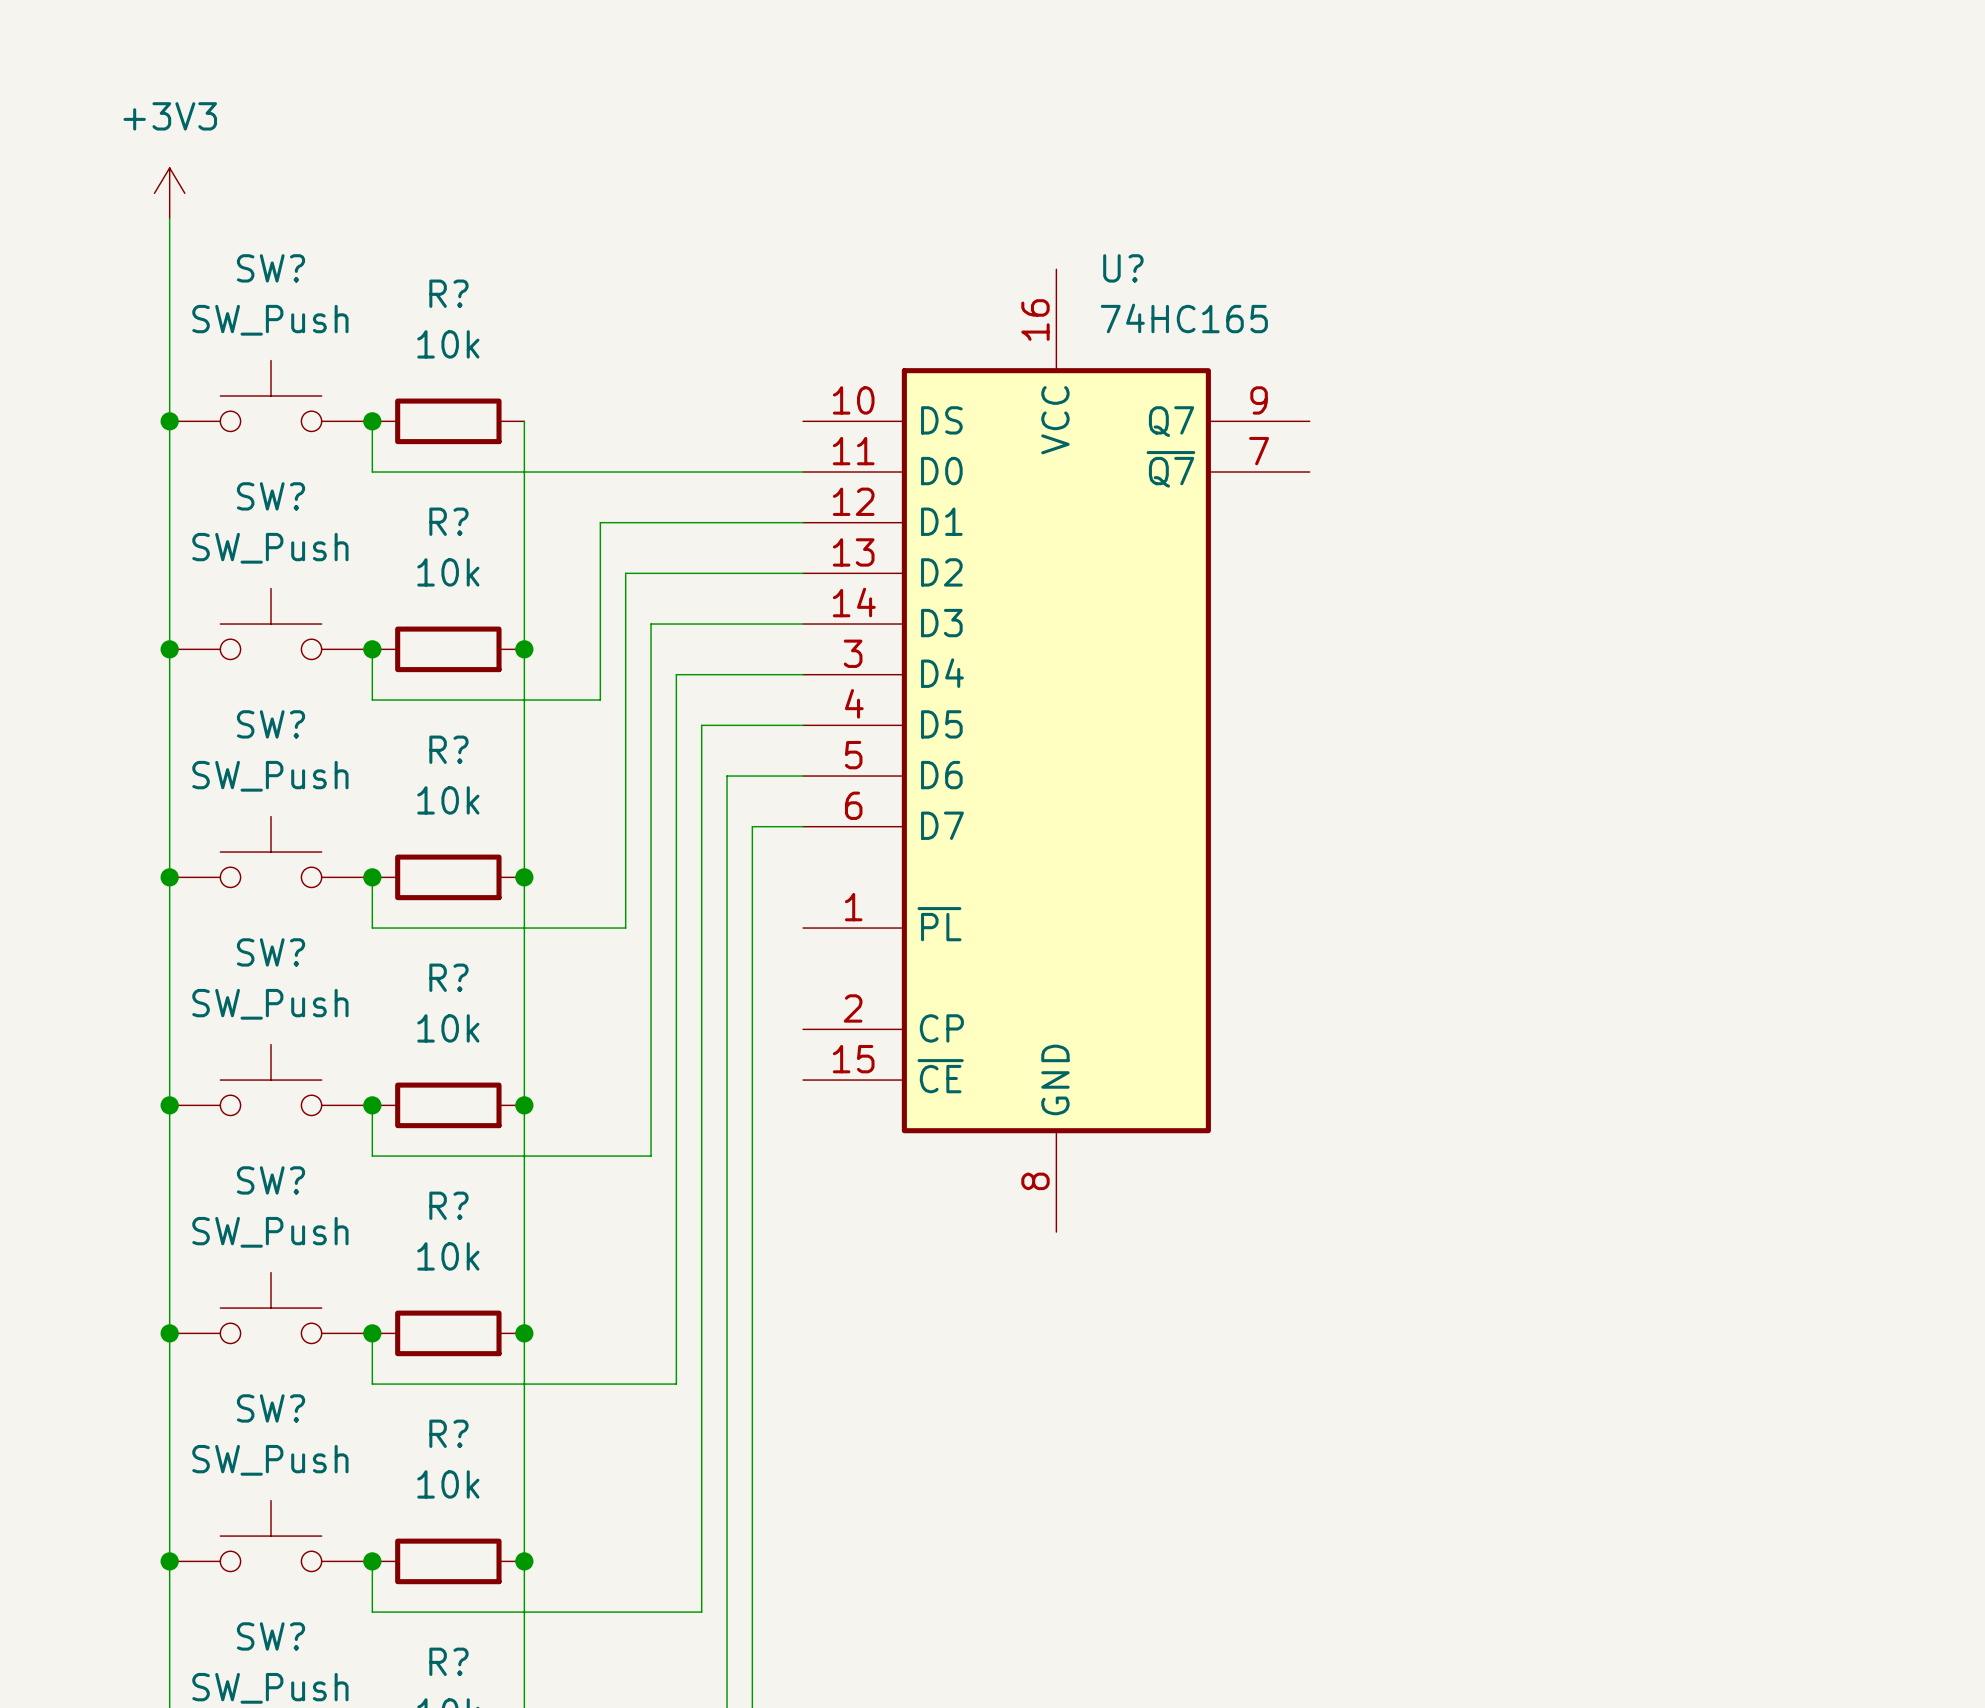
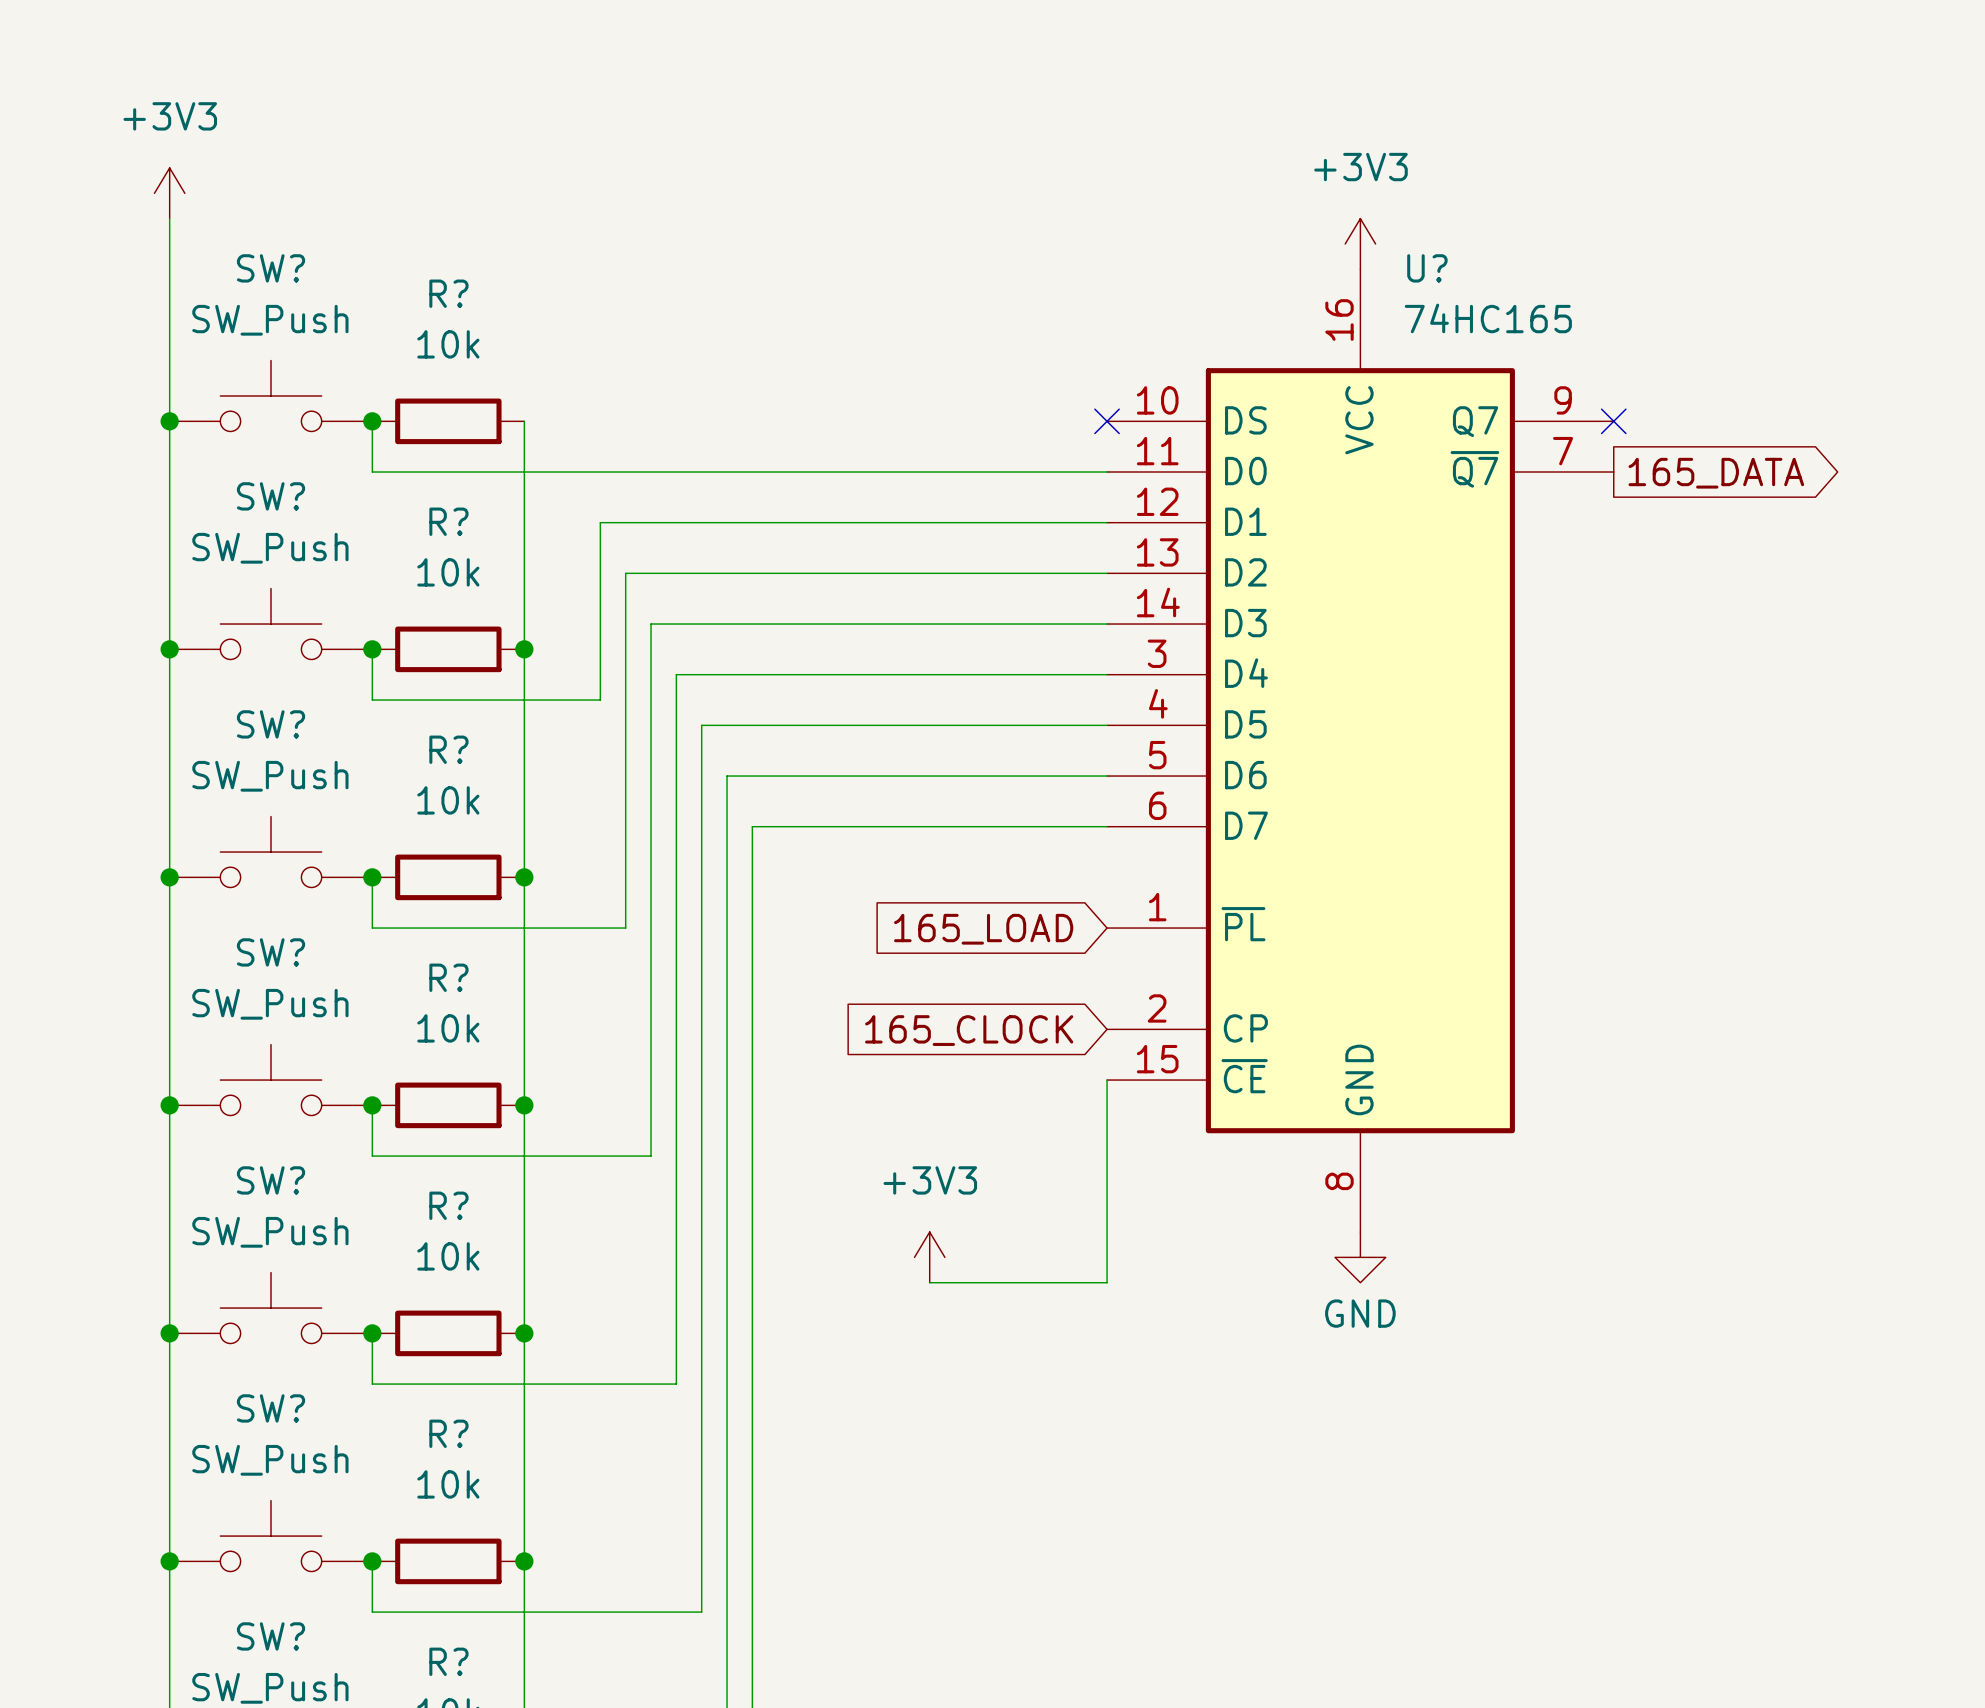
power symbol: none -> +3V3 (1360, 243)
no-connect mark: none -> (1107, 421)
no-connect mark: none -> (1613, 421)
global label: none -> 165_DATA (1716, 473)
U? position: (1056, 750) -> (1360, 750)
global label: none -> 165_LOAD (983, 929)
global label: none -> 165_CLOCK (969, 1030)
wire: none -> (1107, 1080) (1107, 1282) (929, 1282)
power symbol: none -> +3V3 (929, 1257)
power symbol: none -> GND (1360, 1257)

